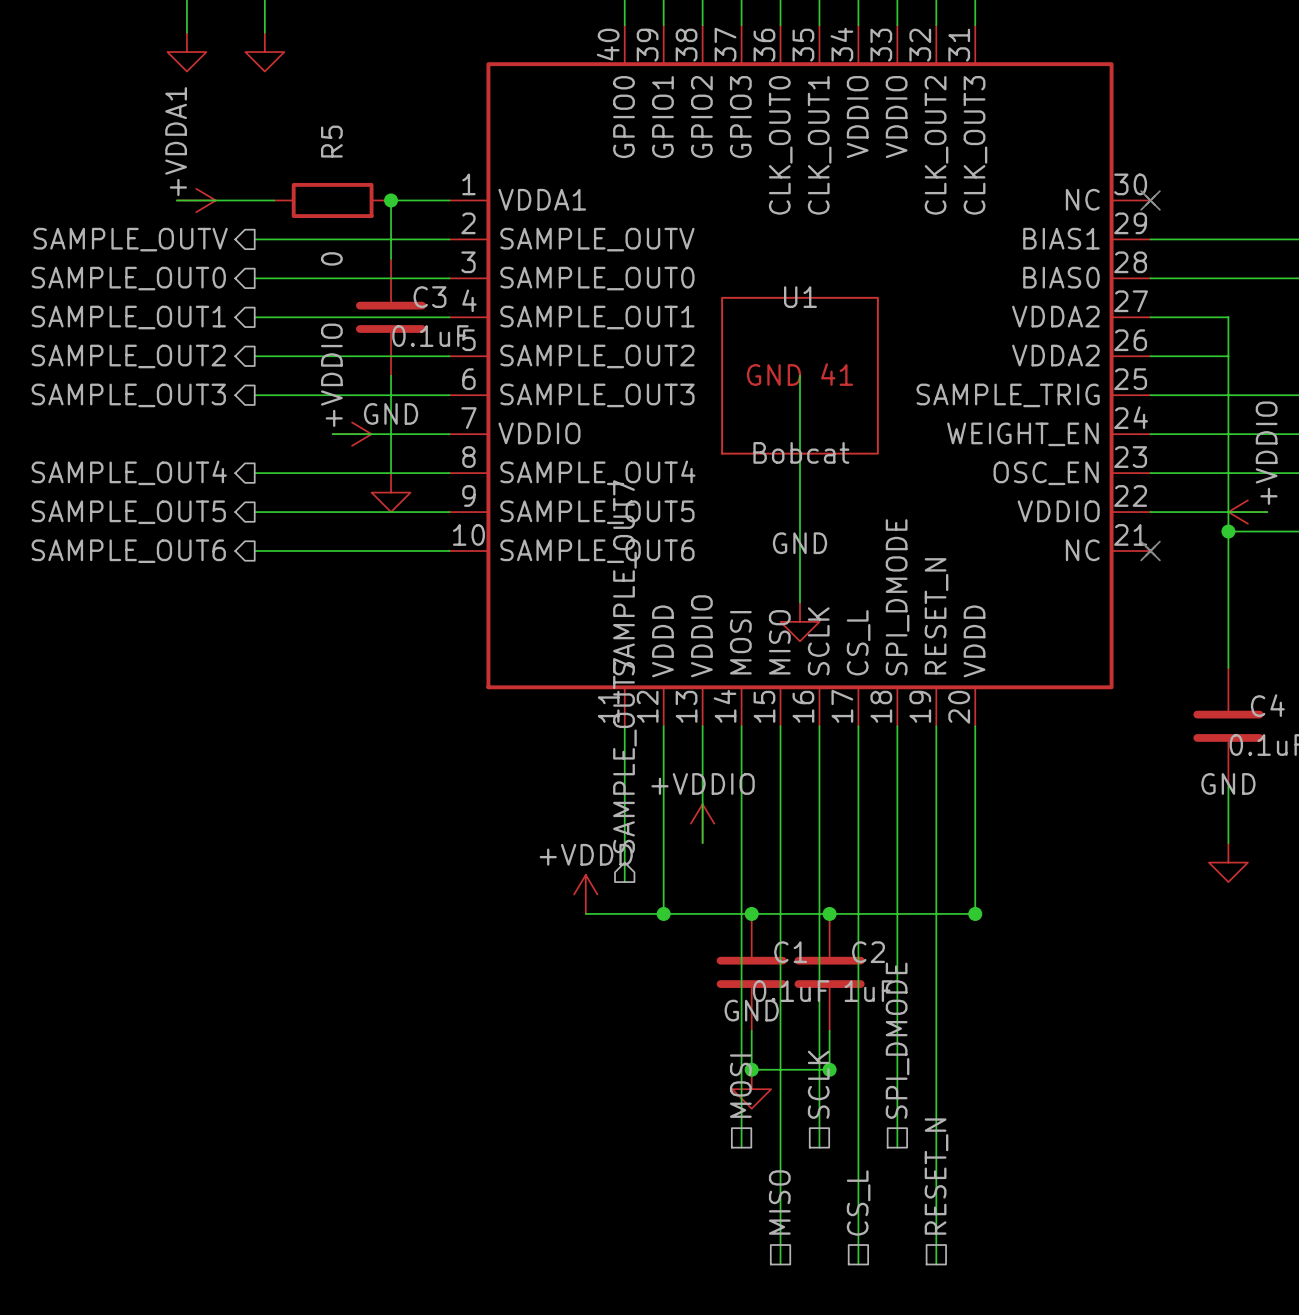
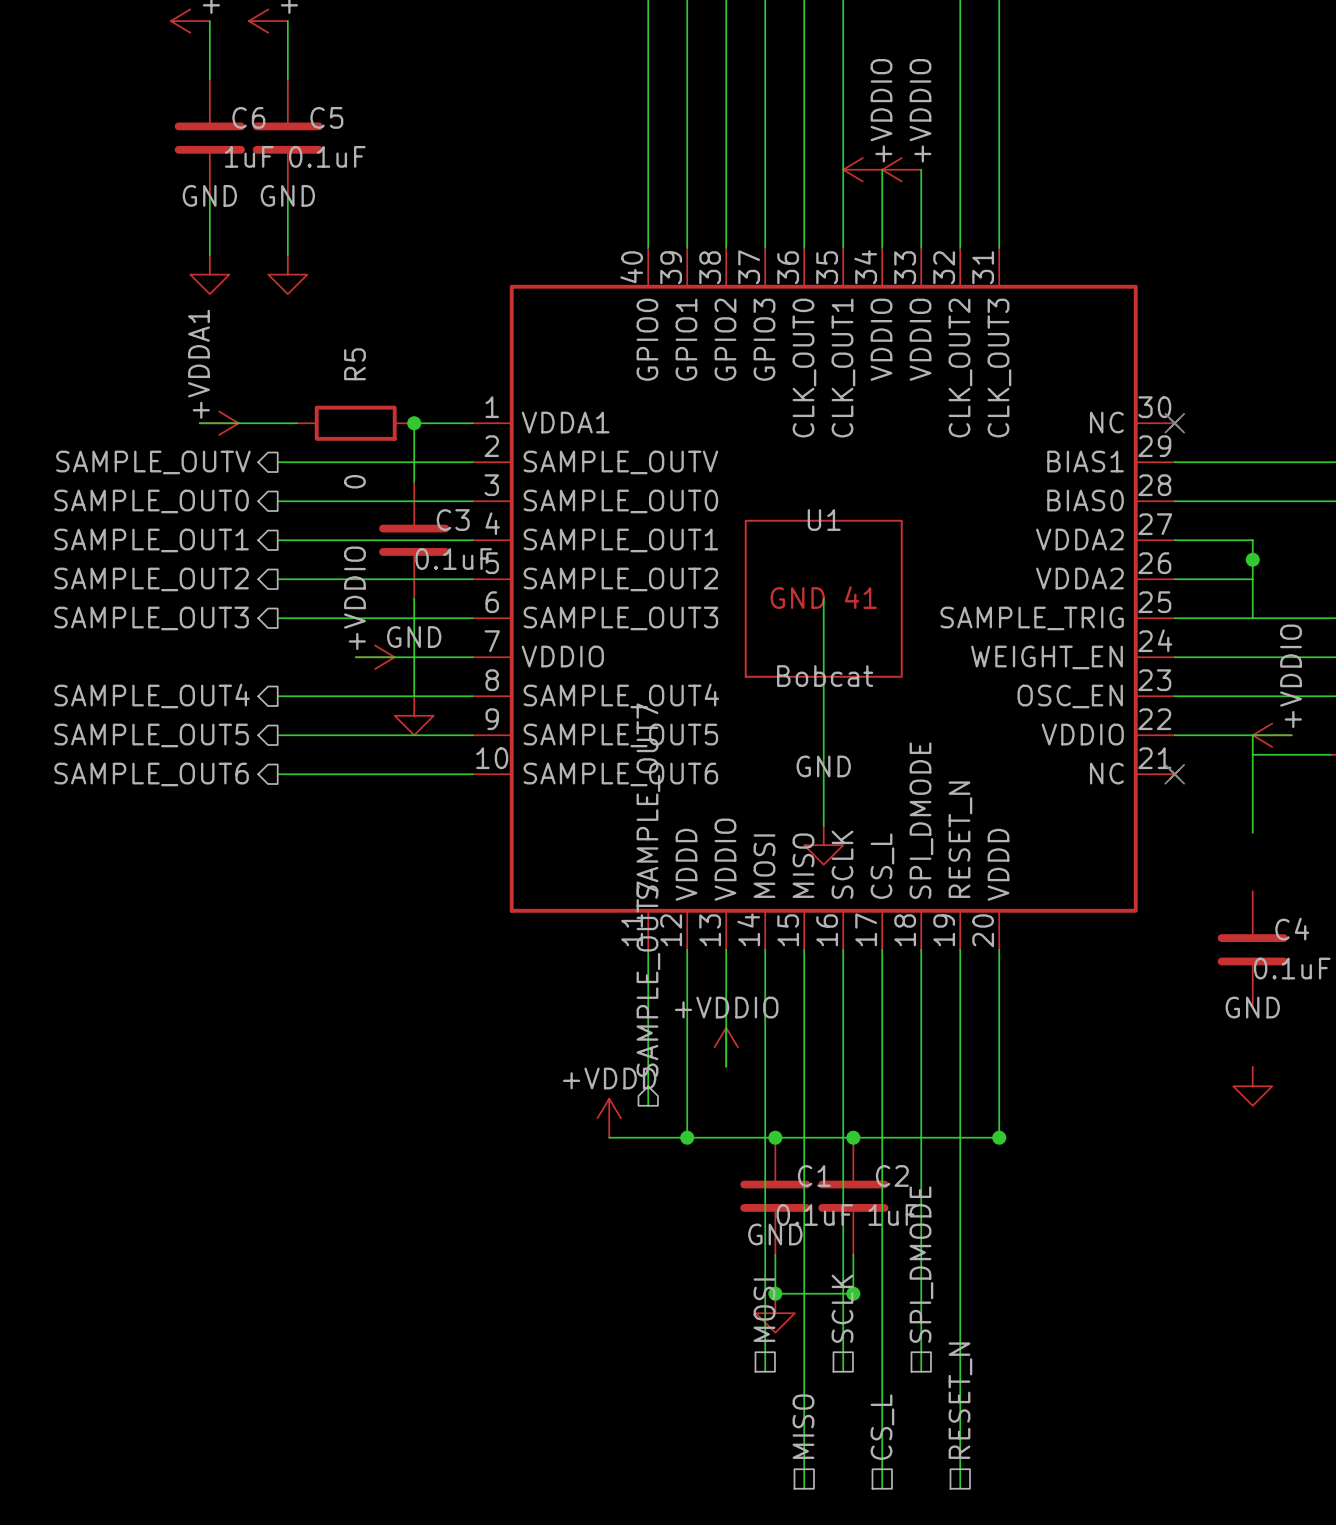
junction: none -> (1252, 559)
wire: (1228, 395) (1228, 512) -> none
junction: (1228, 531) -> none
wire: (1228, 609) (1228, 667) -> none
wire: (1228, 784) (1228, 843) -> none

